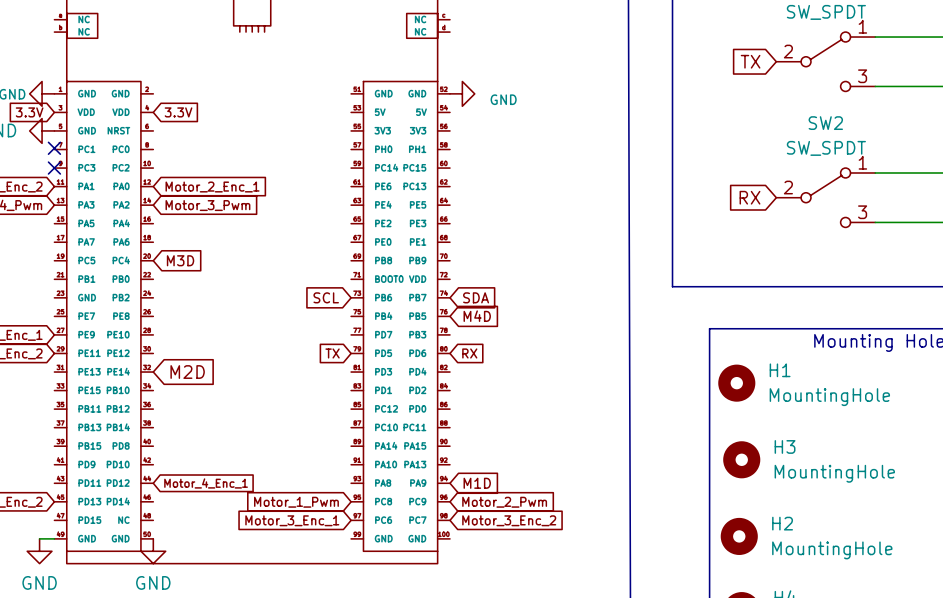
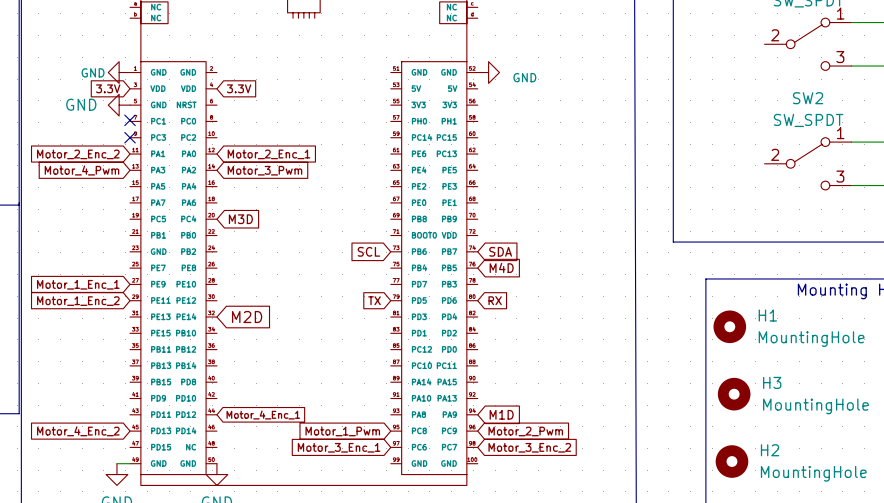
global label: TX (750, 61) -> none
global label: RX (749, 197) -> none

